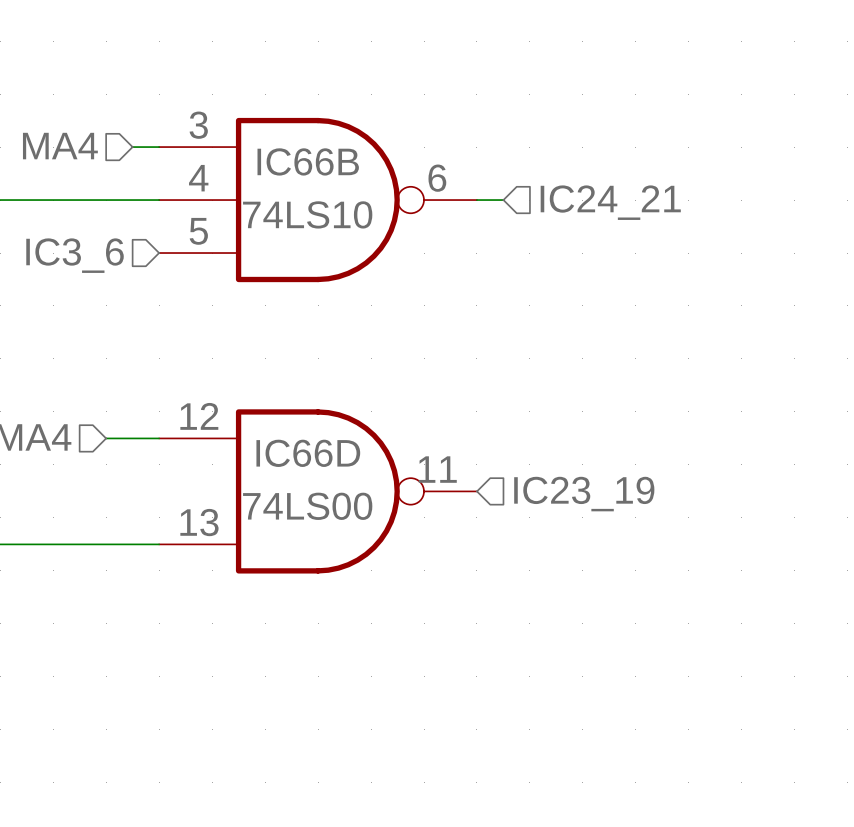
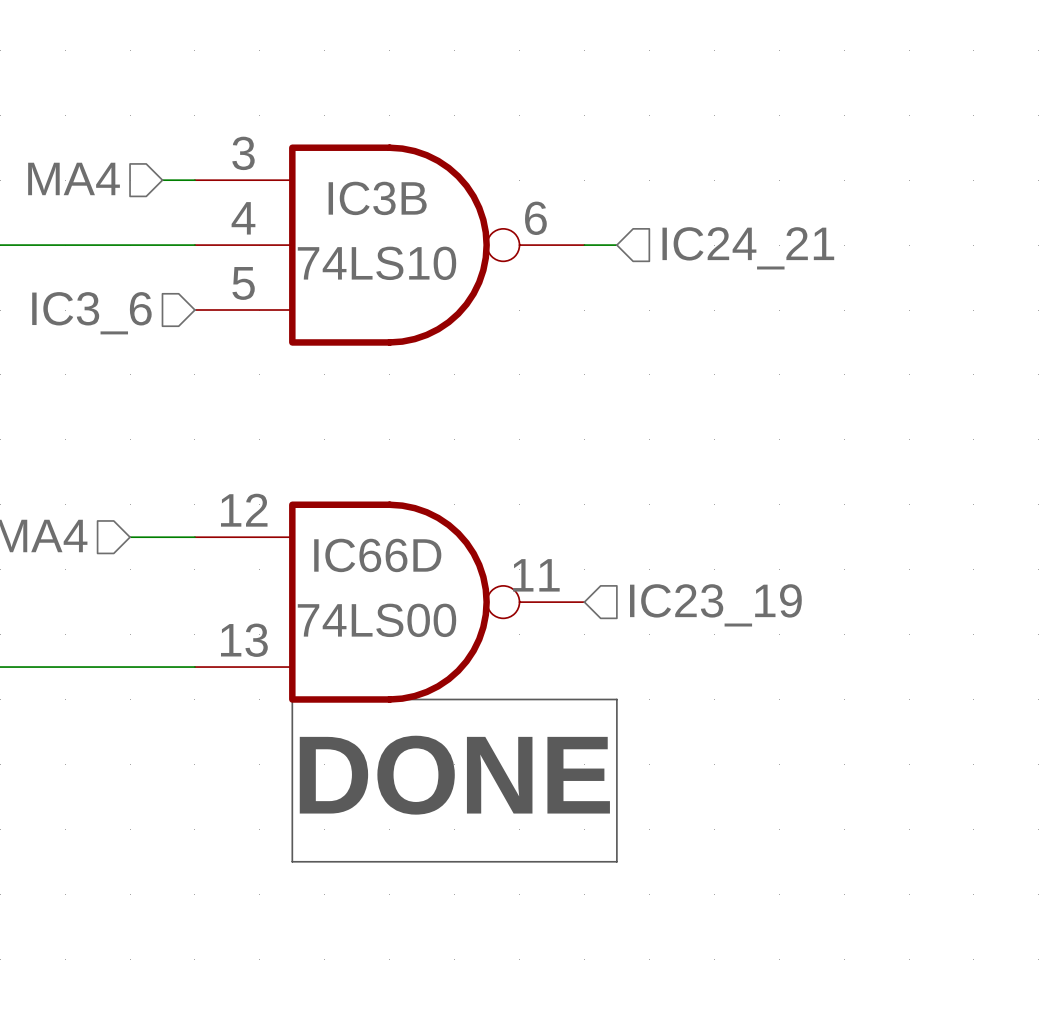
IC66B name: IC66B (308, 161) -> IC3B (377, 198)
line: none -> (292, 699) (616, 699) (616, 861) (292, 861) (292, 699)
text: none -> DONE (454, 775)

